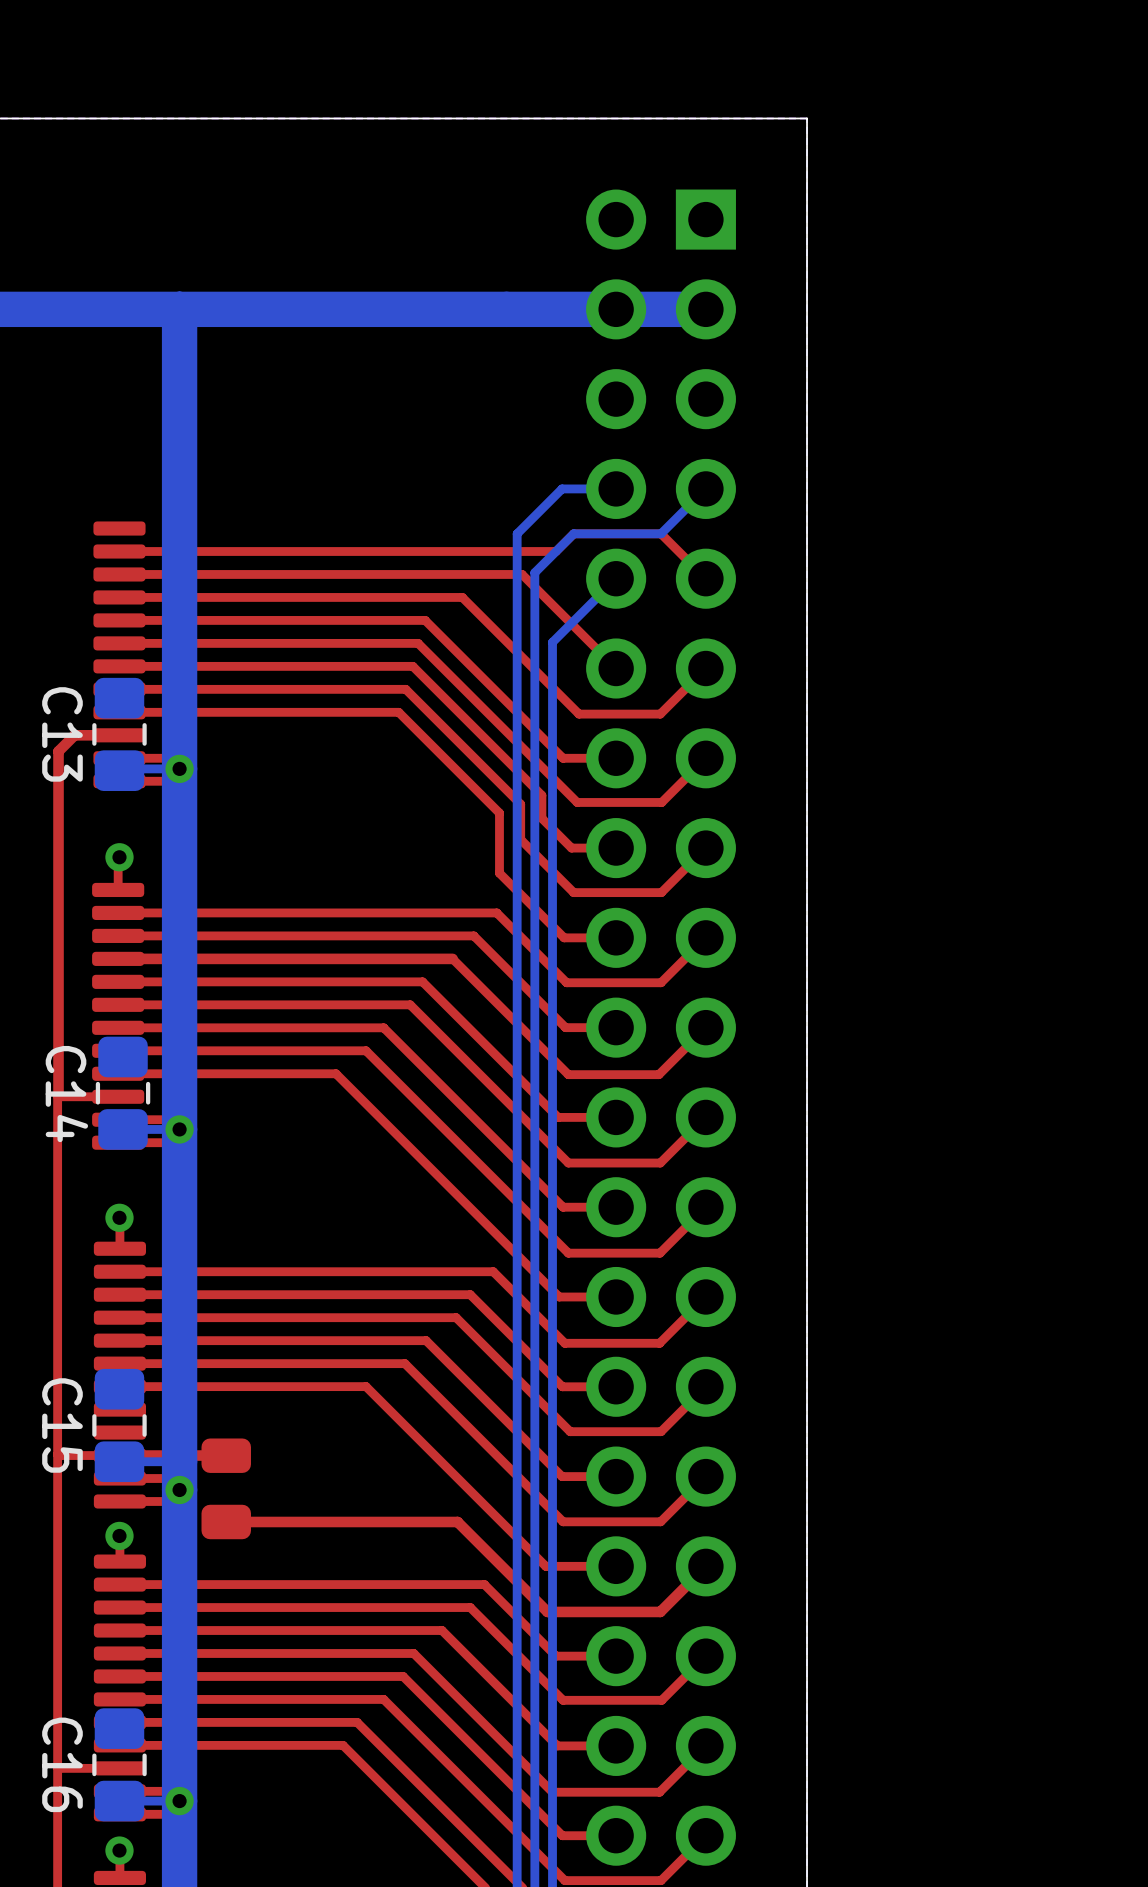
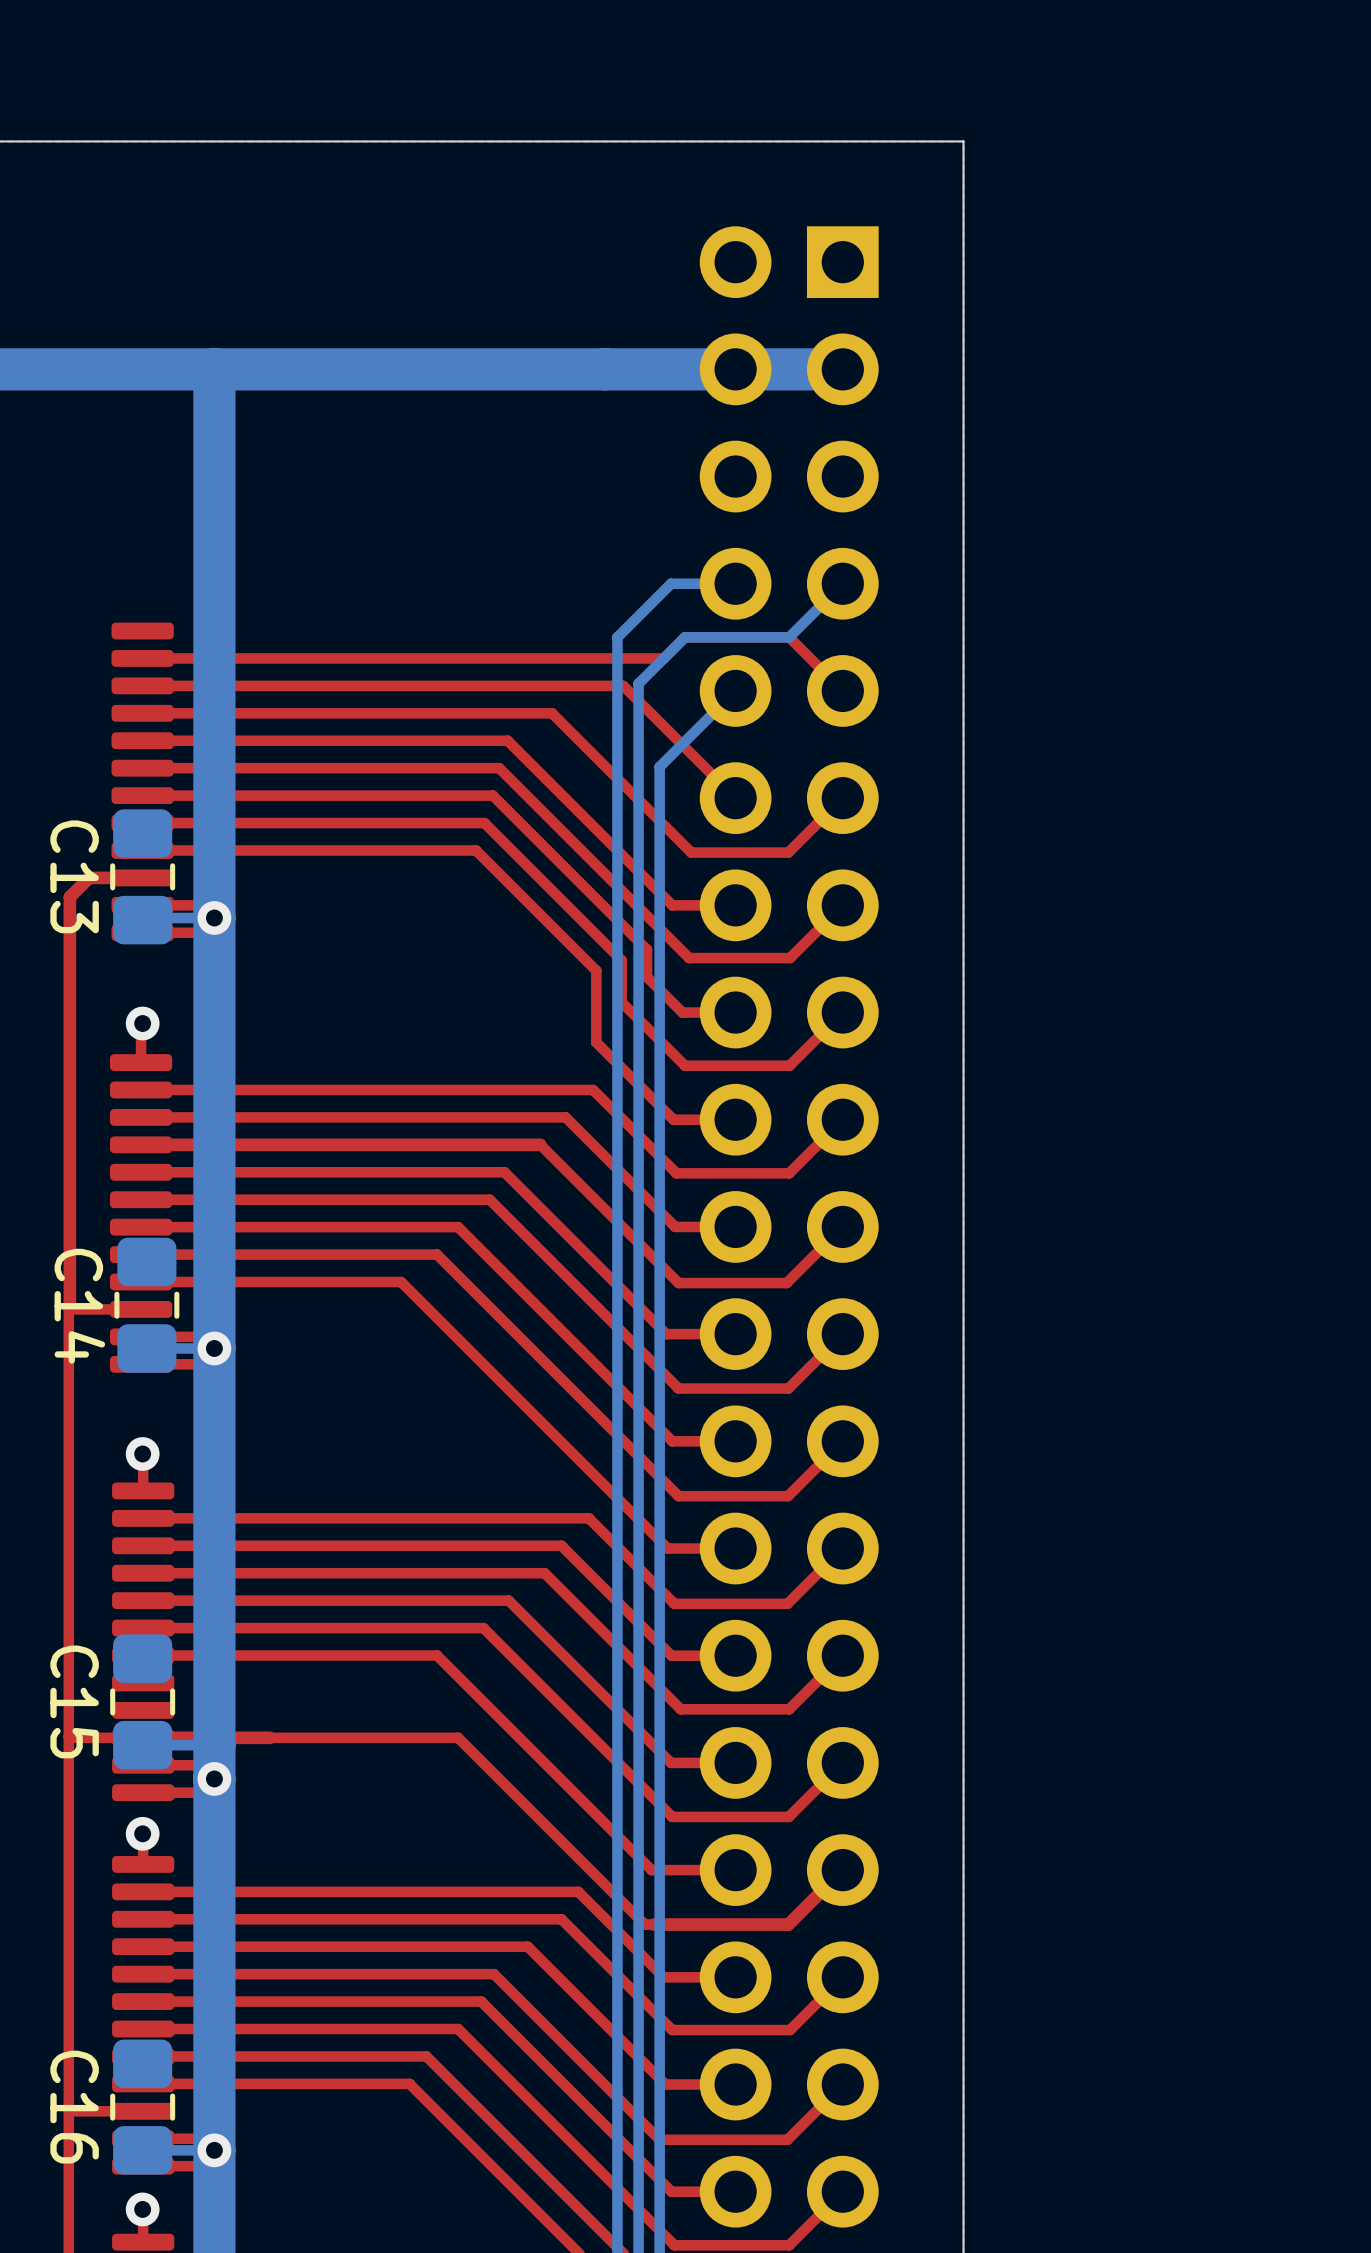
part: (226, 1488) -> none
top track: (226, 1521) (457, 1521) (547, 1611) -> (269, 1737) (458, 1737) (644, 1924) (653, 1924)

